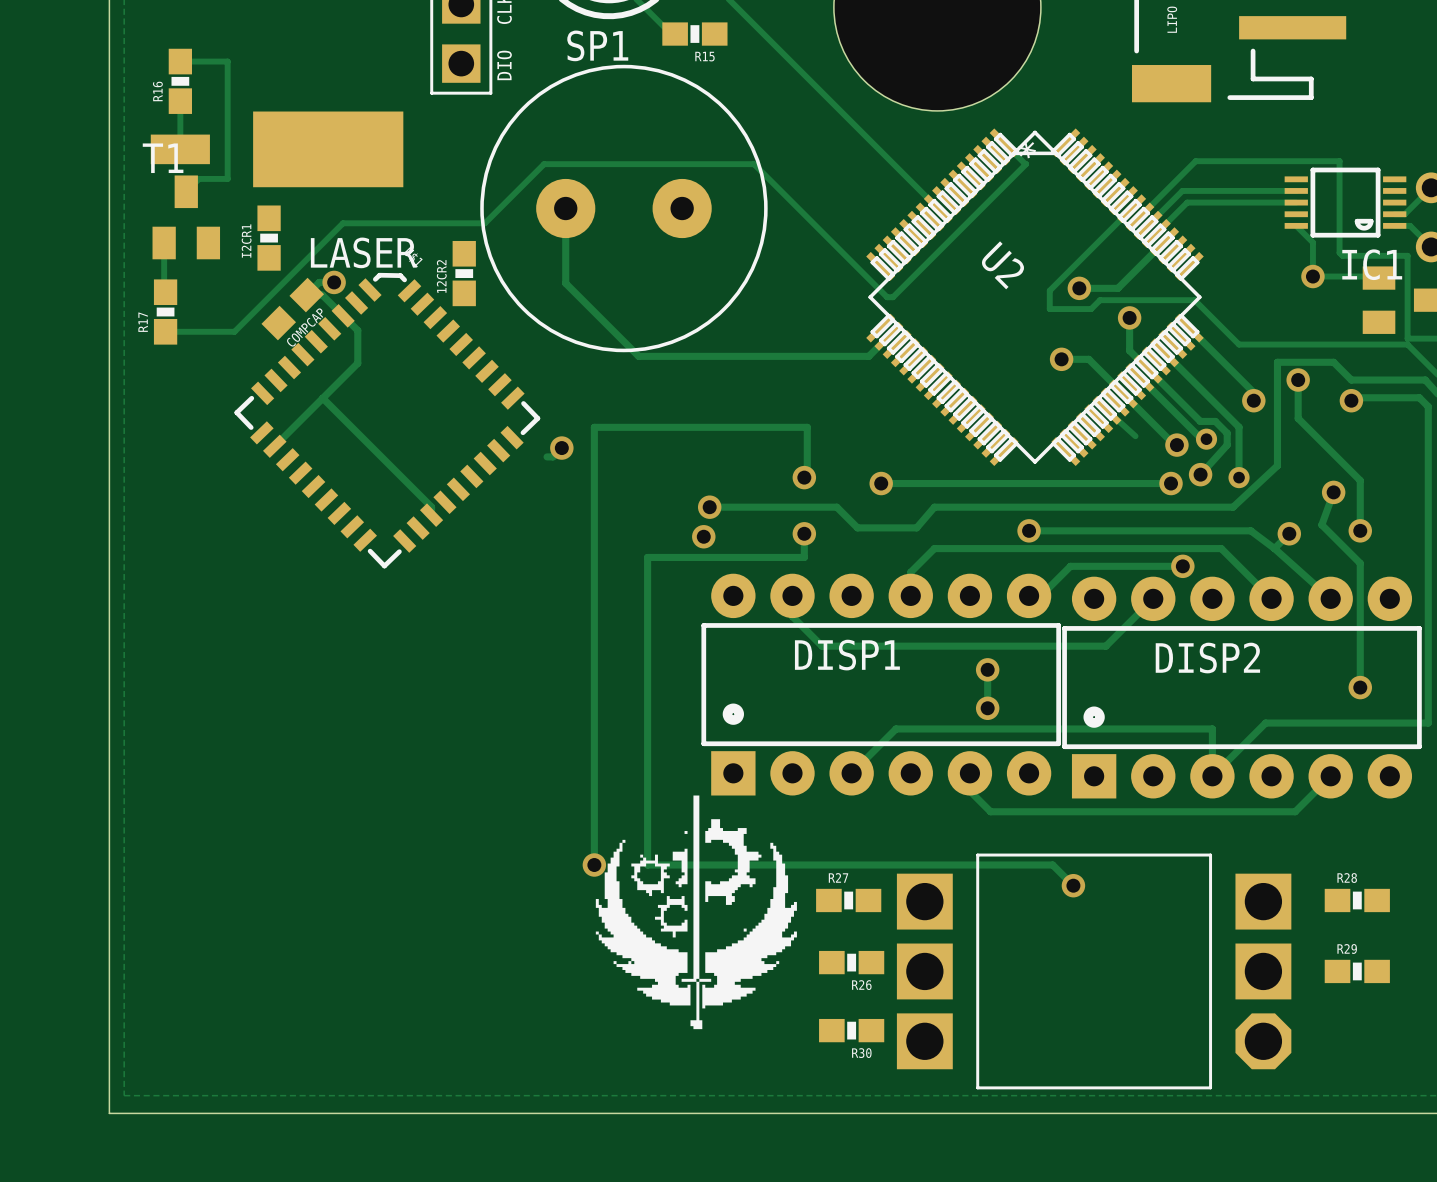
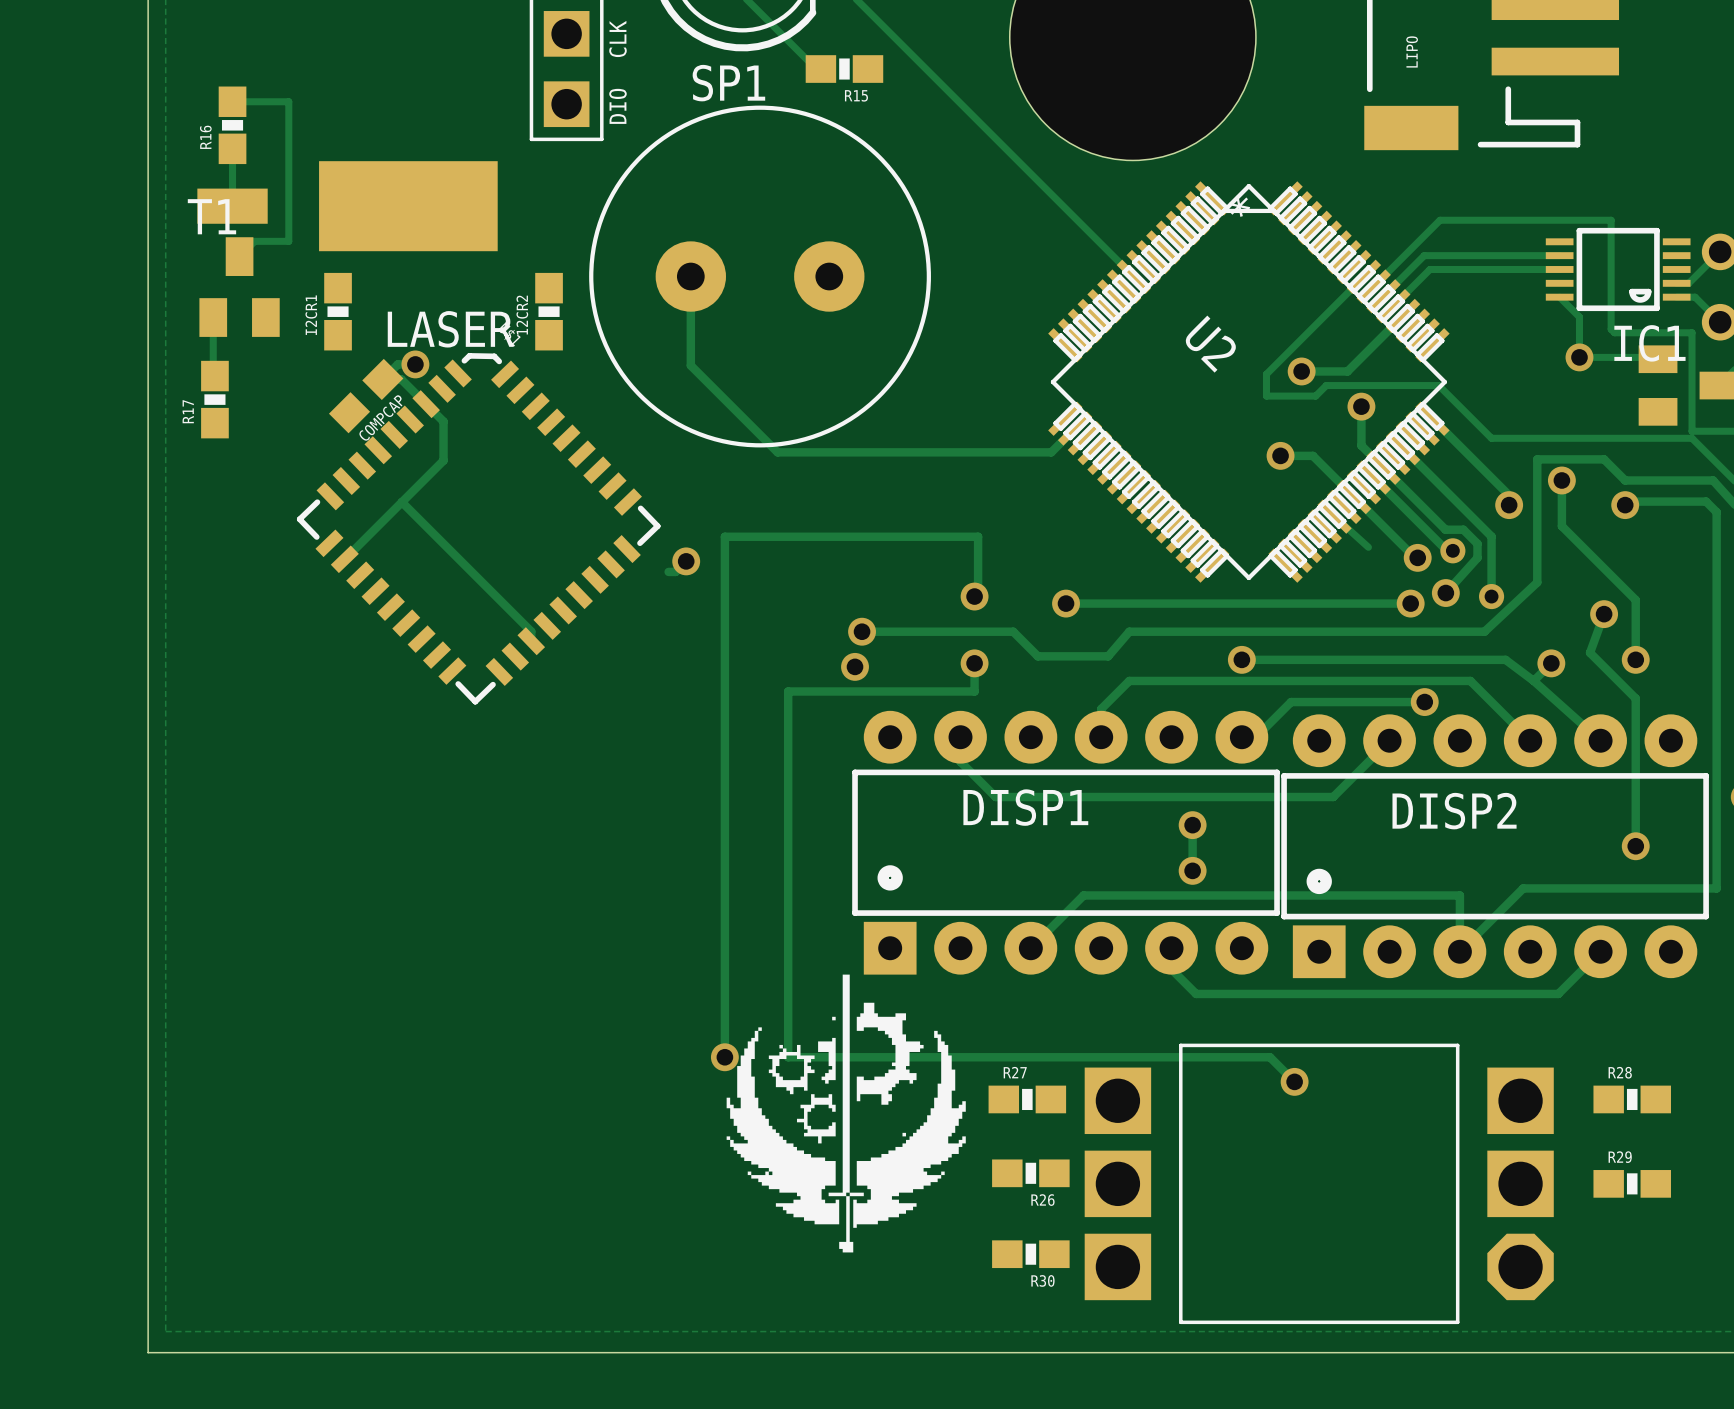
track: (1004, 142) (1026, 164) (893, 297) (887, 297) (754, 164) (544, 164) (484, 223) (343, 223) (234, 331) (165, 331) -> none
12CR2 position: (464, 273) -> (549, 311)

